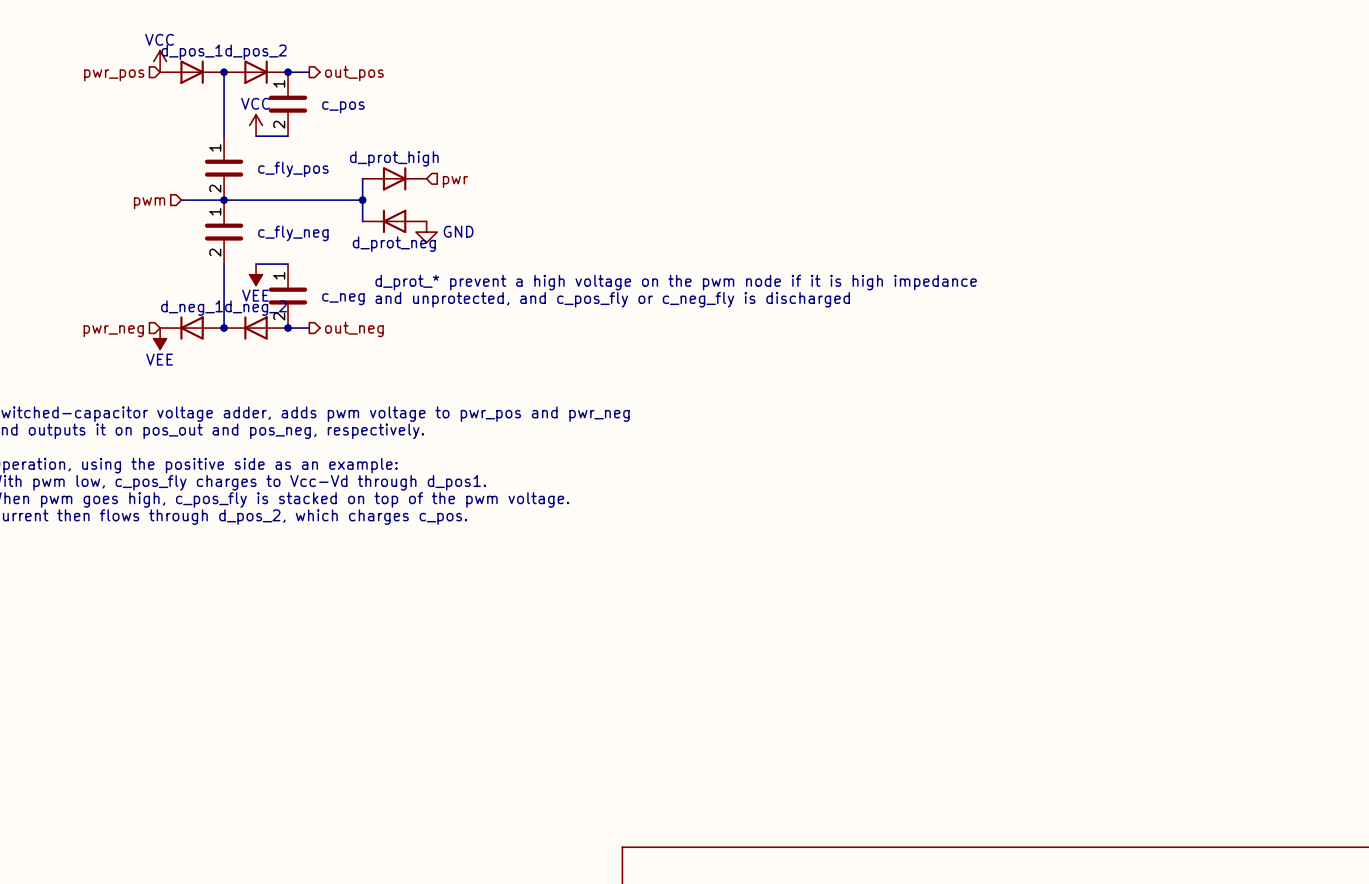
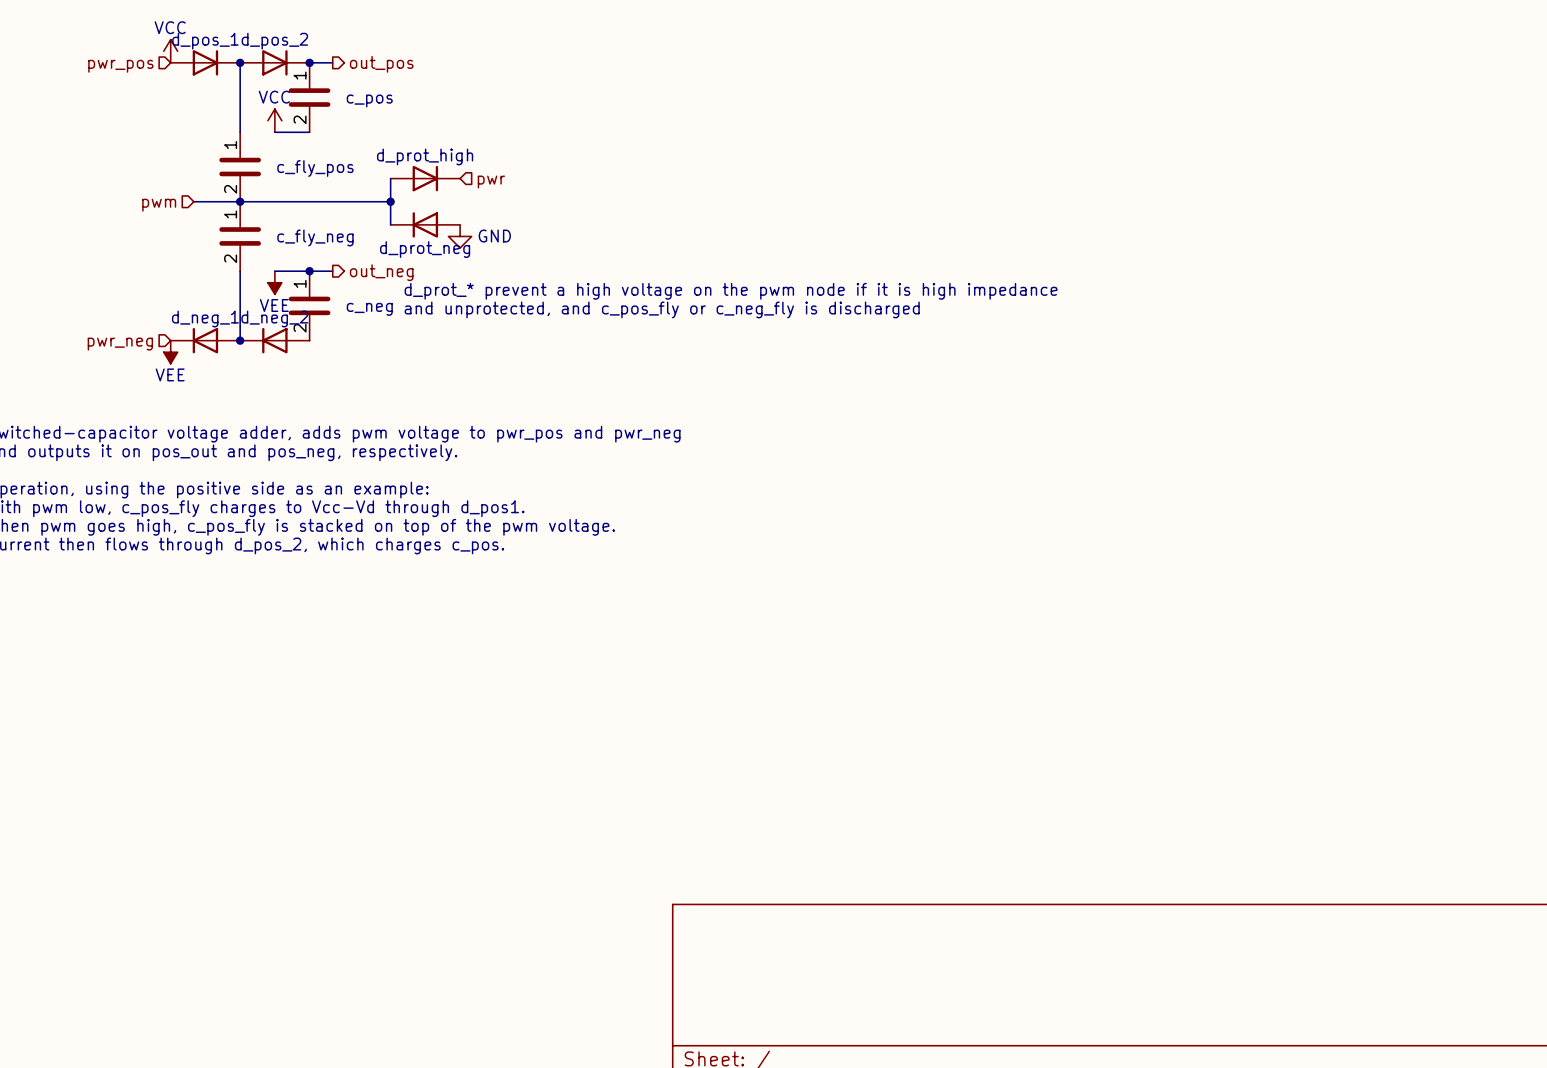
junction: none -> (309, 271)
wire: (288, 328) (309, 328) -> (309, 271) (332, 271)
junction: (288, 328) -> none
hierarchical label position: out_neg (354, 329) -> out_neg (381, 272)

